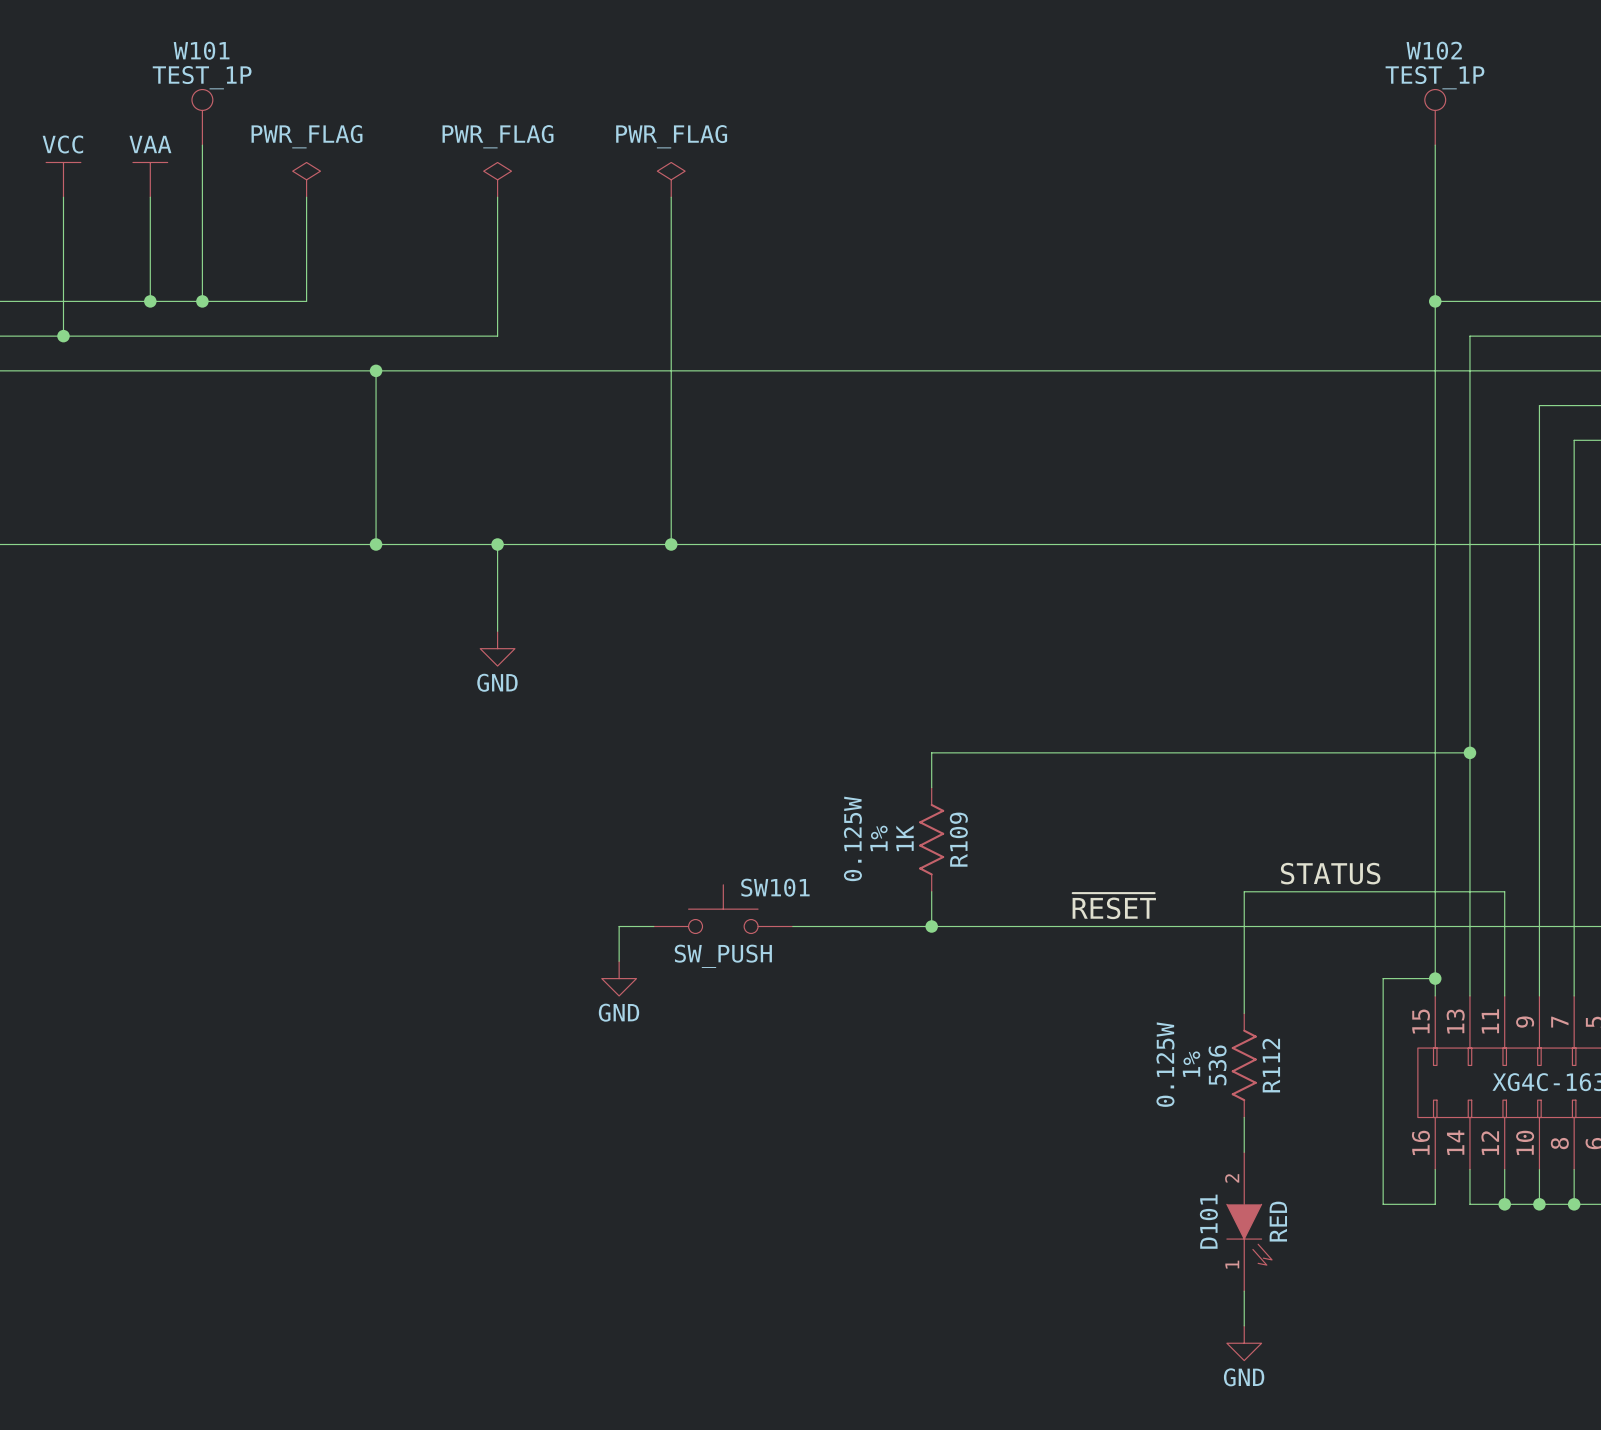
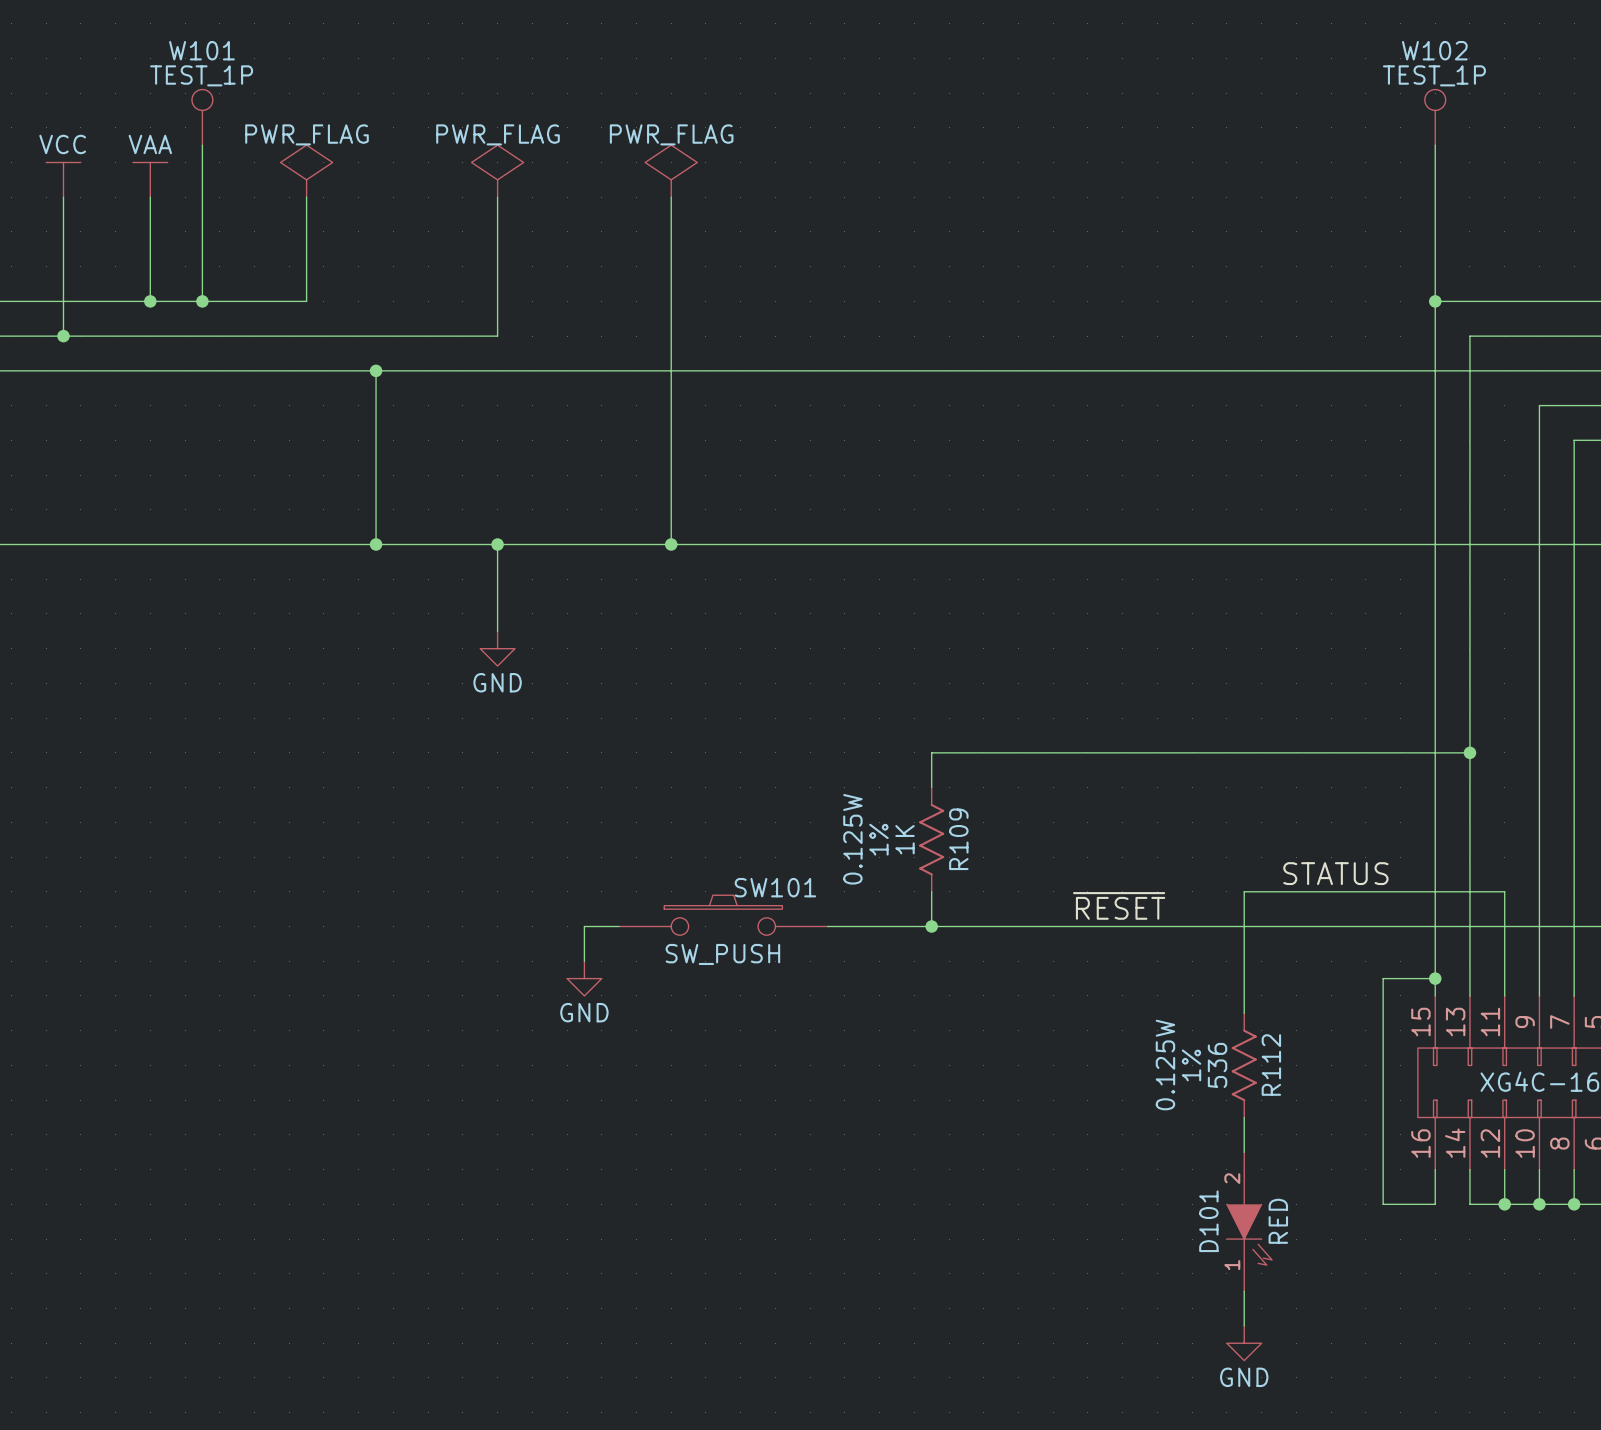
power symbol shape: [292, 162, 321, 198] -> [280, 145, 333, 198]
power symbol shape: [483, 162, 512, 198] -> [471, 145, 524, 198]
power symbol shape: [657, 162, 686, 198] -> [645, 145, 698, 198]
SW101 symbol: [653, 884, 793, 934] -> [619, 895, 828, 936]
wire: (653, 926) (619, 926) (619, 961) -> (619, 926) (584, 926) (584, 961)
power symbol position: GND (619, 978) -> GND (584, 978)

